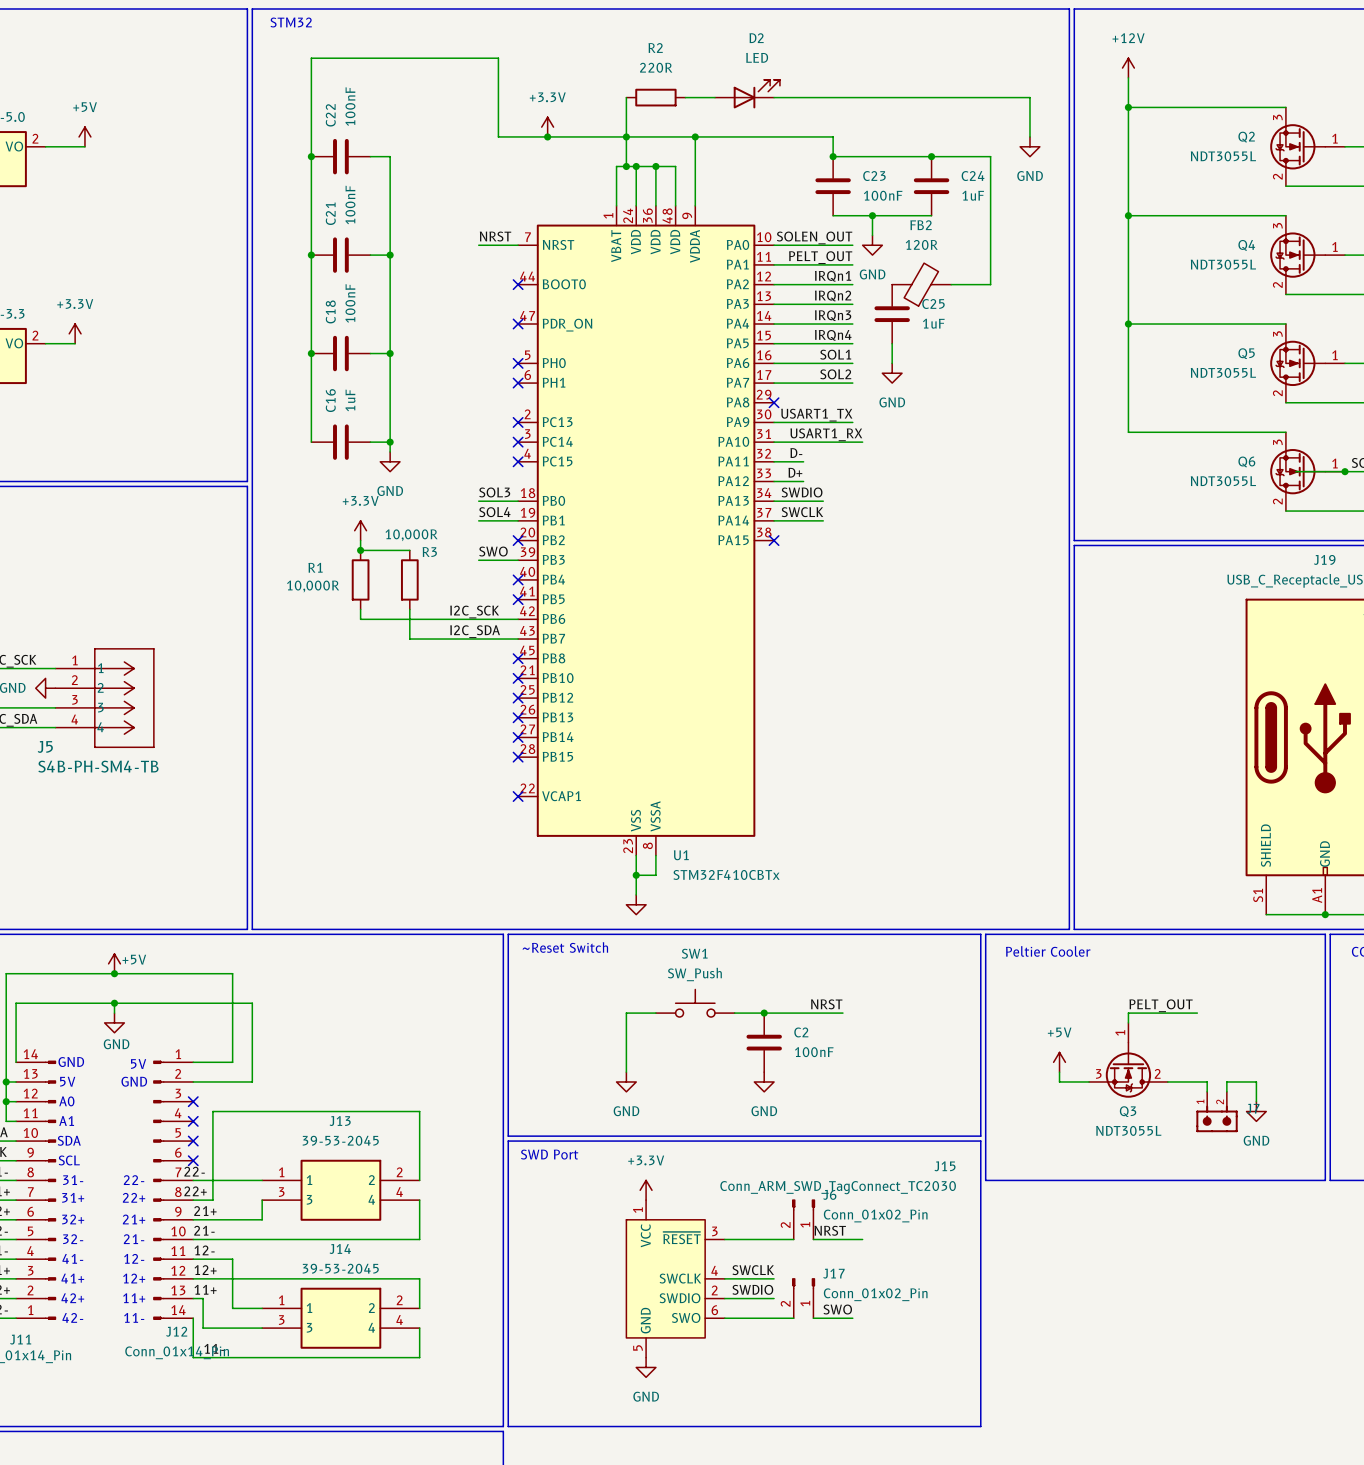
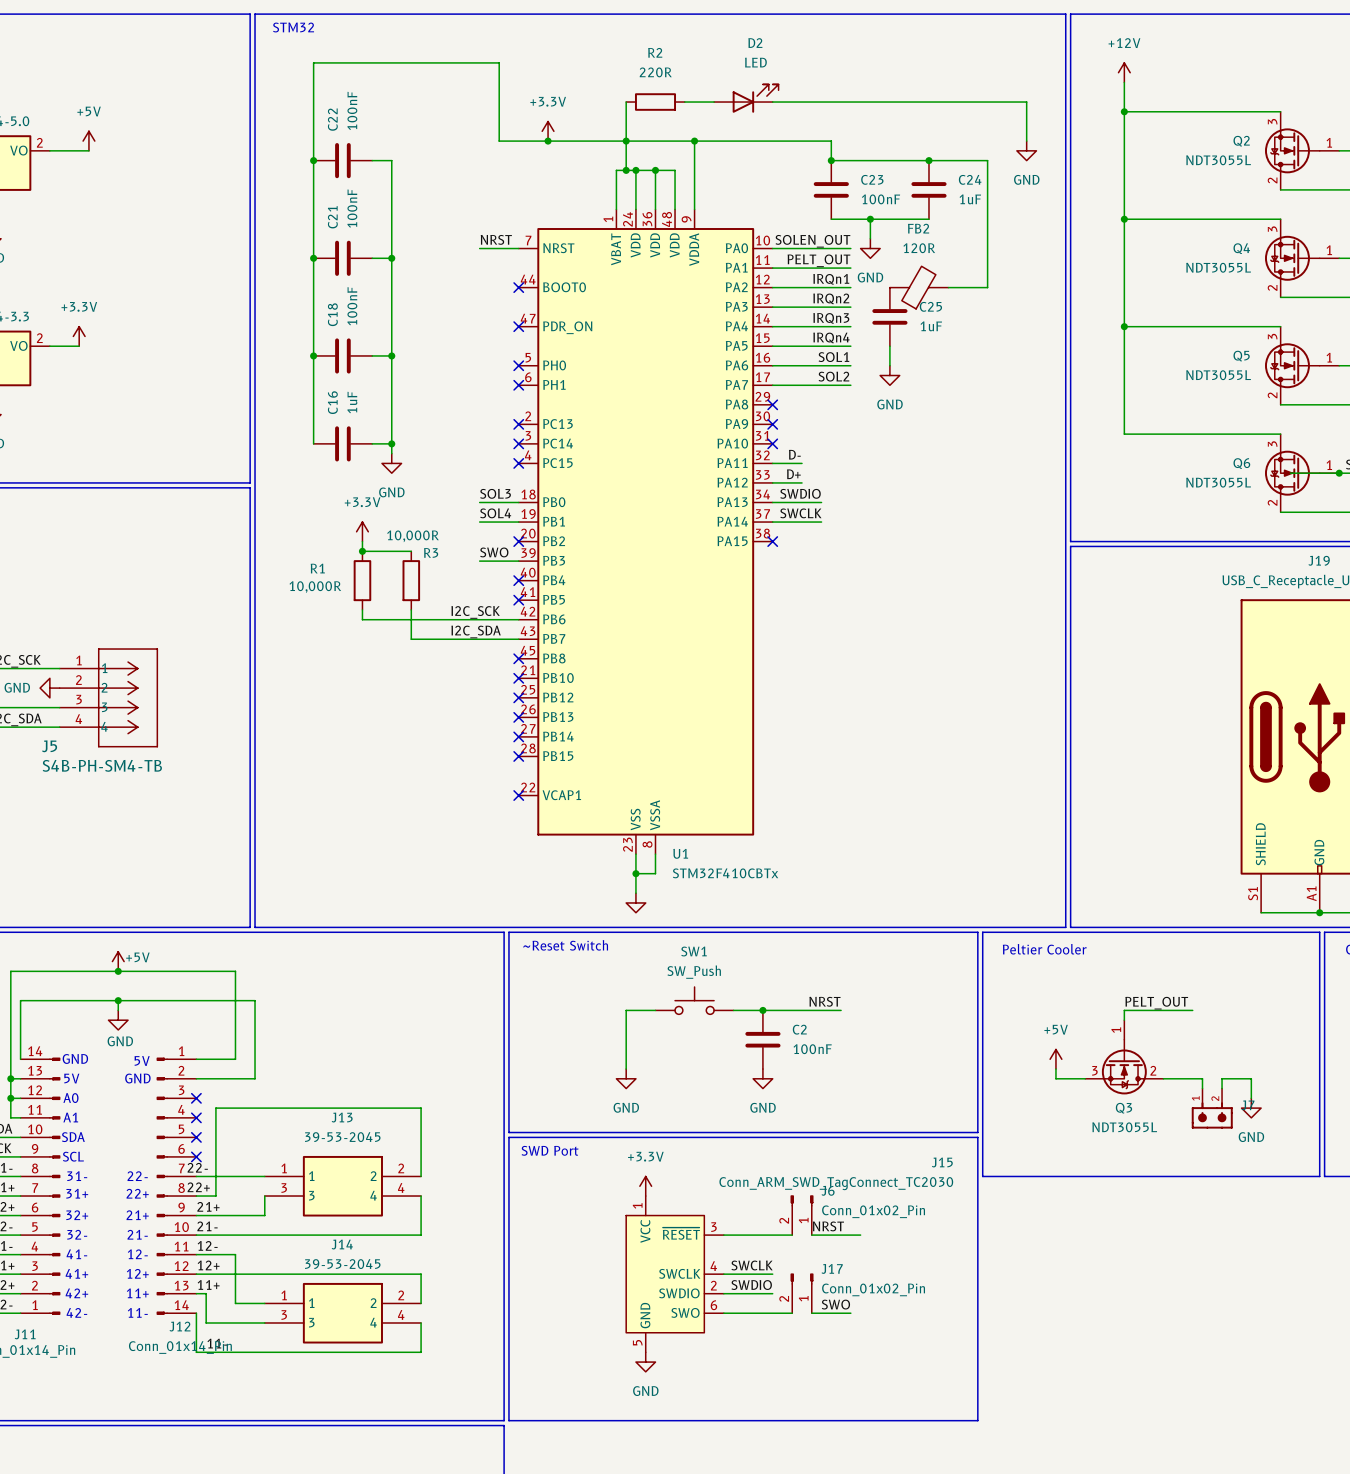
label: USART1_TX (816, 415) -> none
wire: (774, 422) (852, 422) -> none
no-connect mark: none -> (772, 424)
label: USART1_RX (826, 434) -> none
wire: (774, 442) (862, 442) -> none
no-connect mark: none -> (772, 443)

